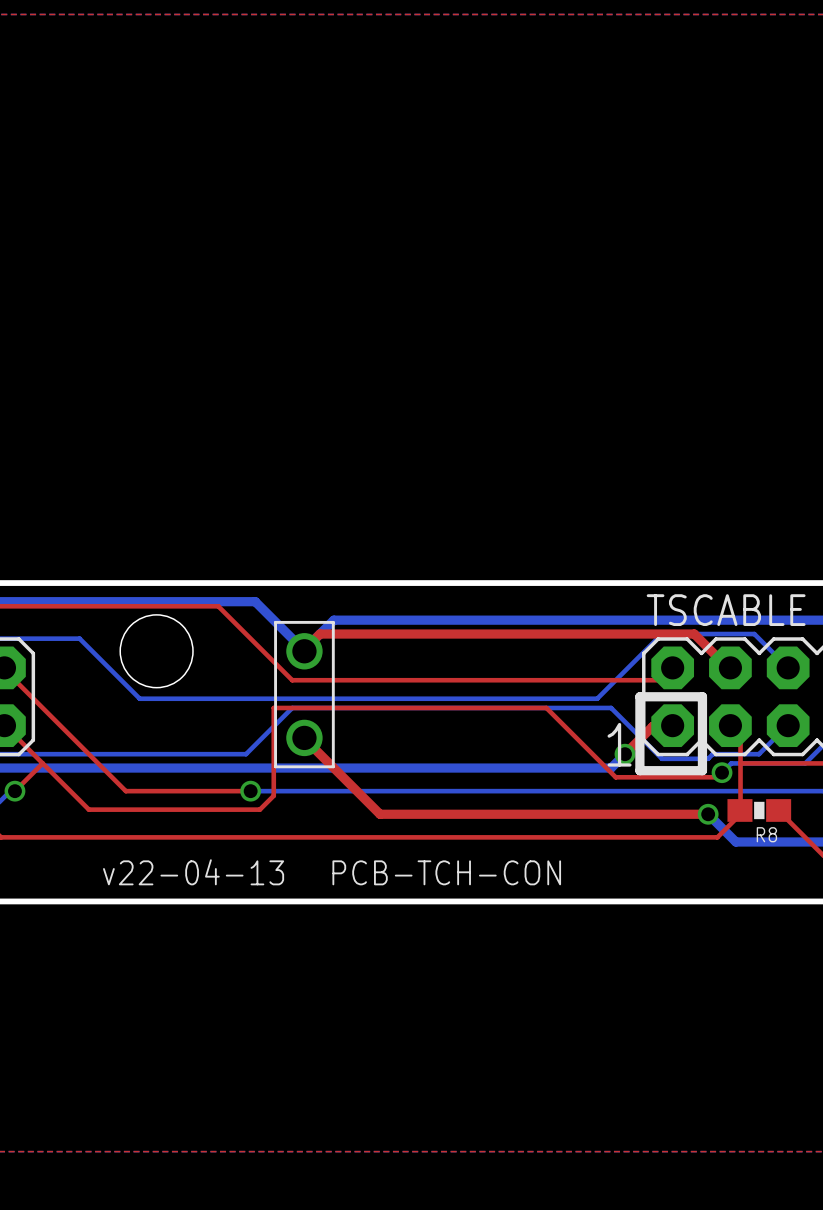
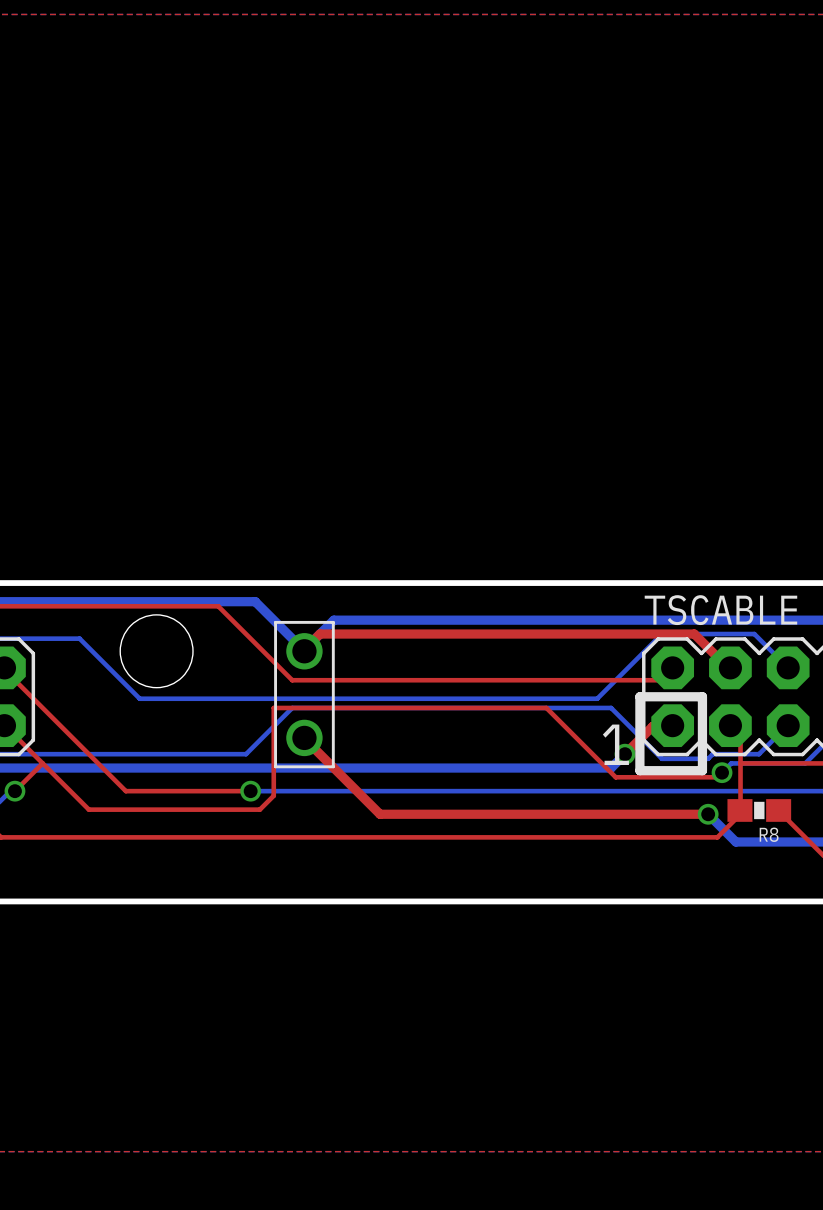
text: v22-04-13 (193, 872) -> none
text: PCB-TCH-CON (446, 872) -> none

